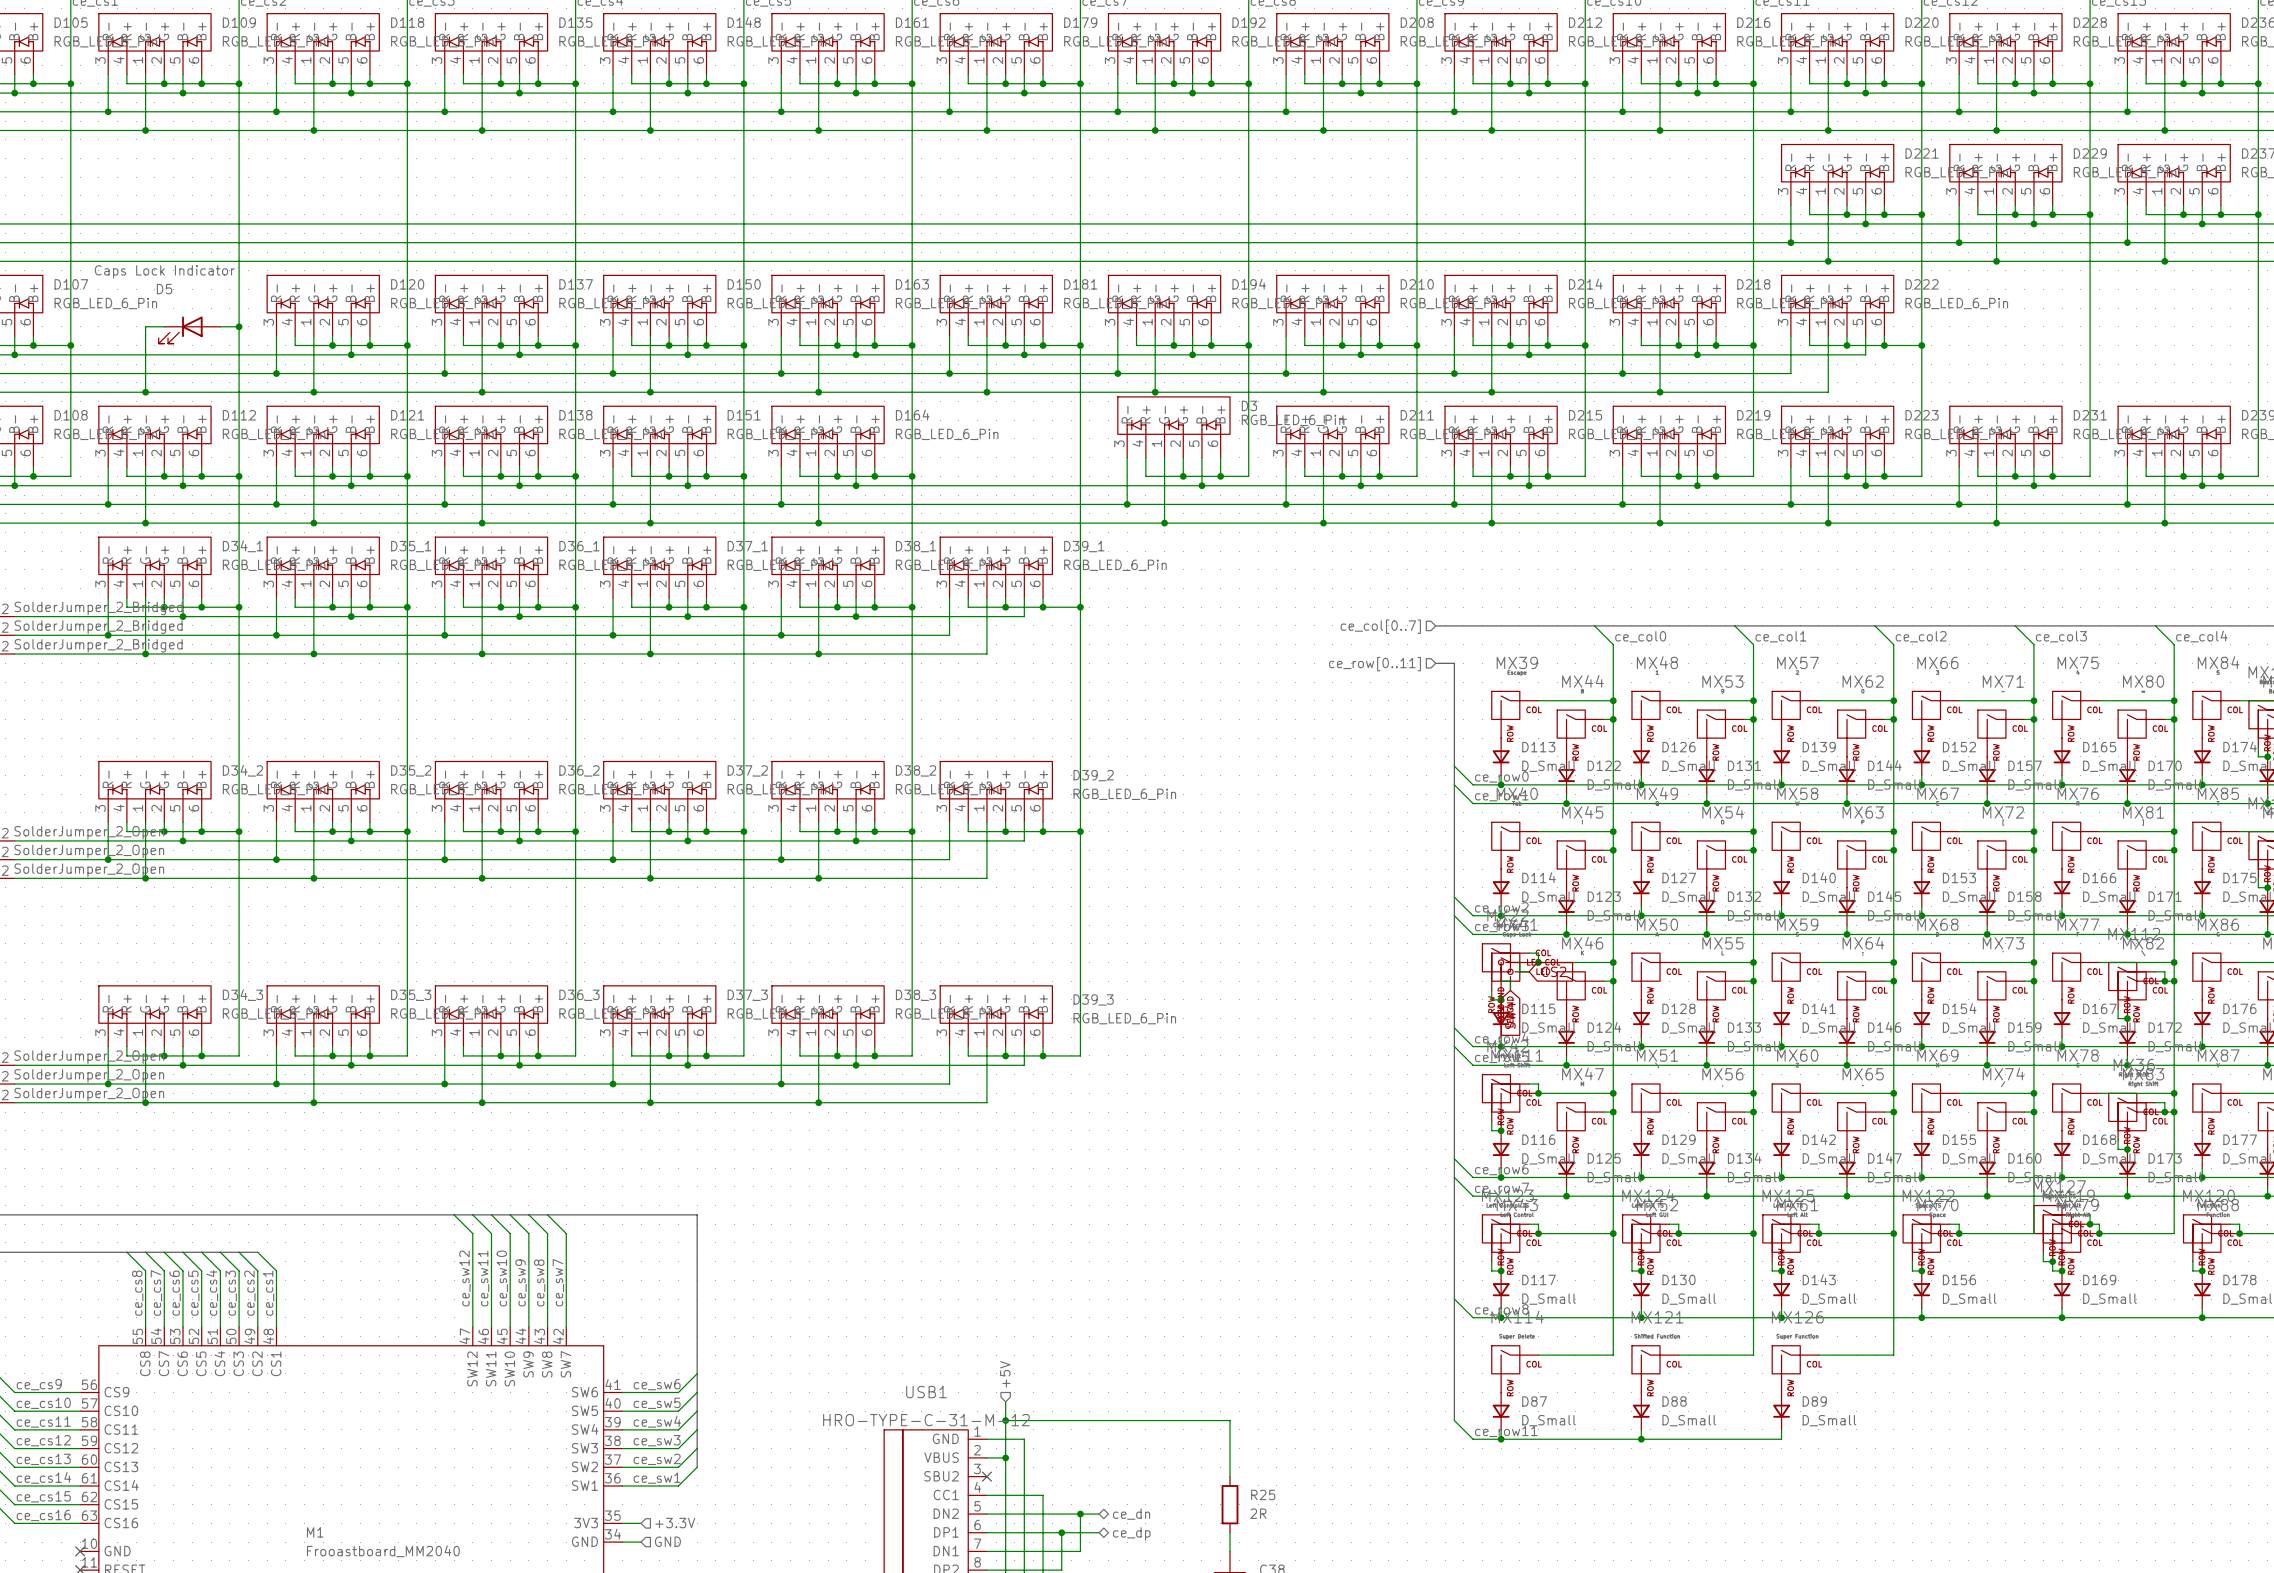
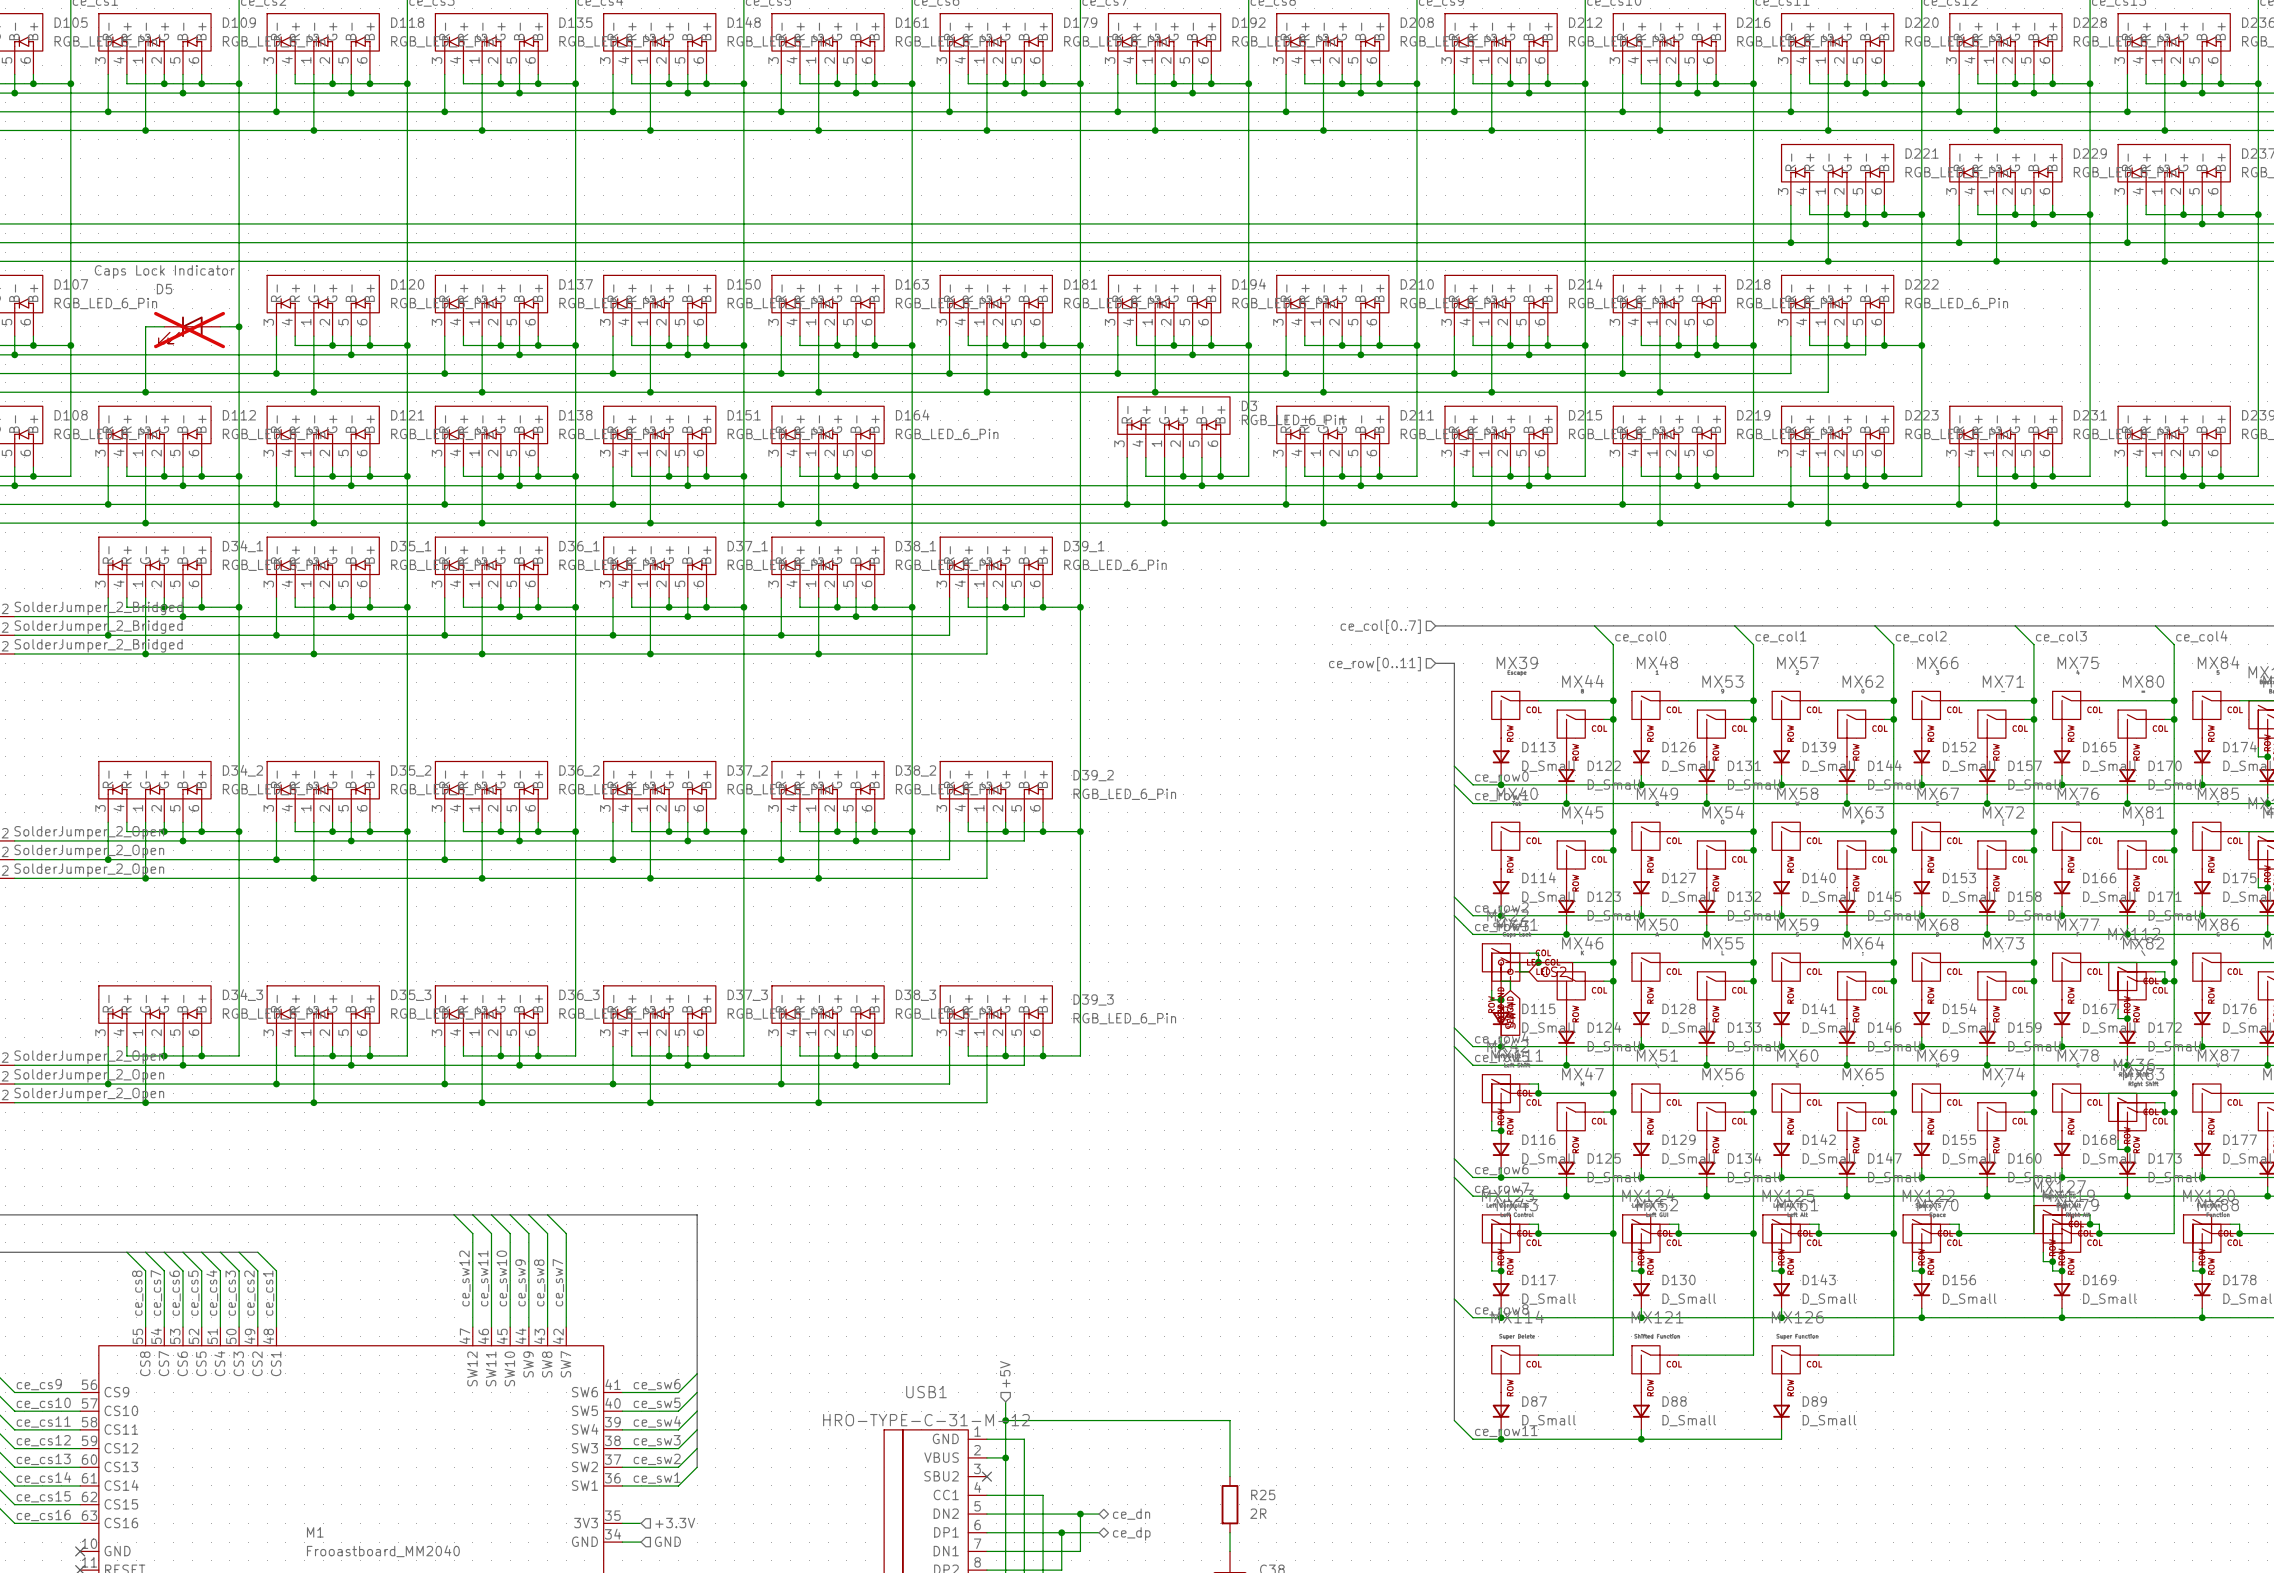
D5 do-not-place cross: none -> (189, 330)

